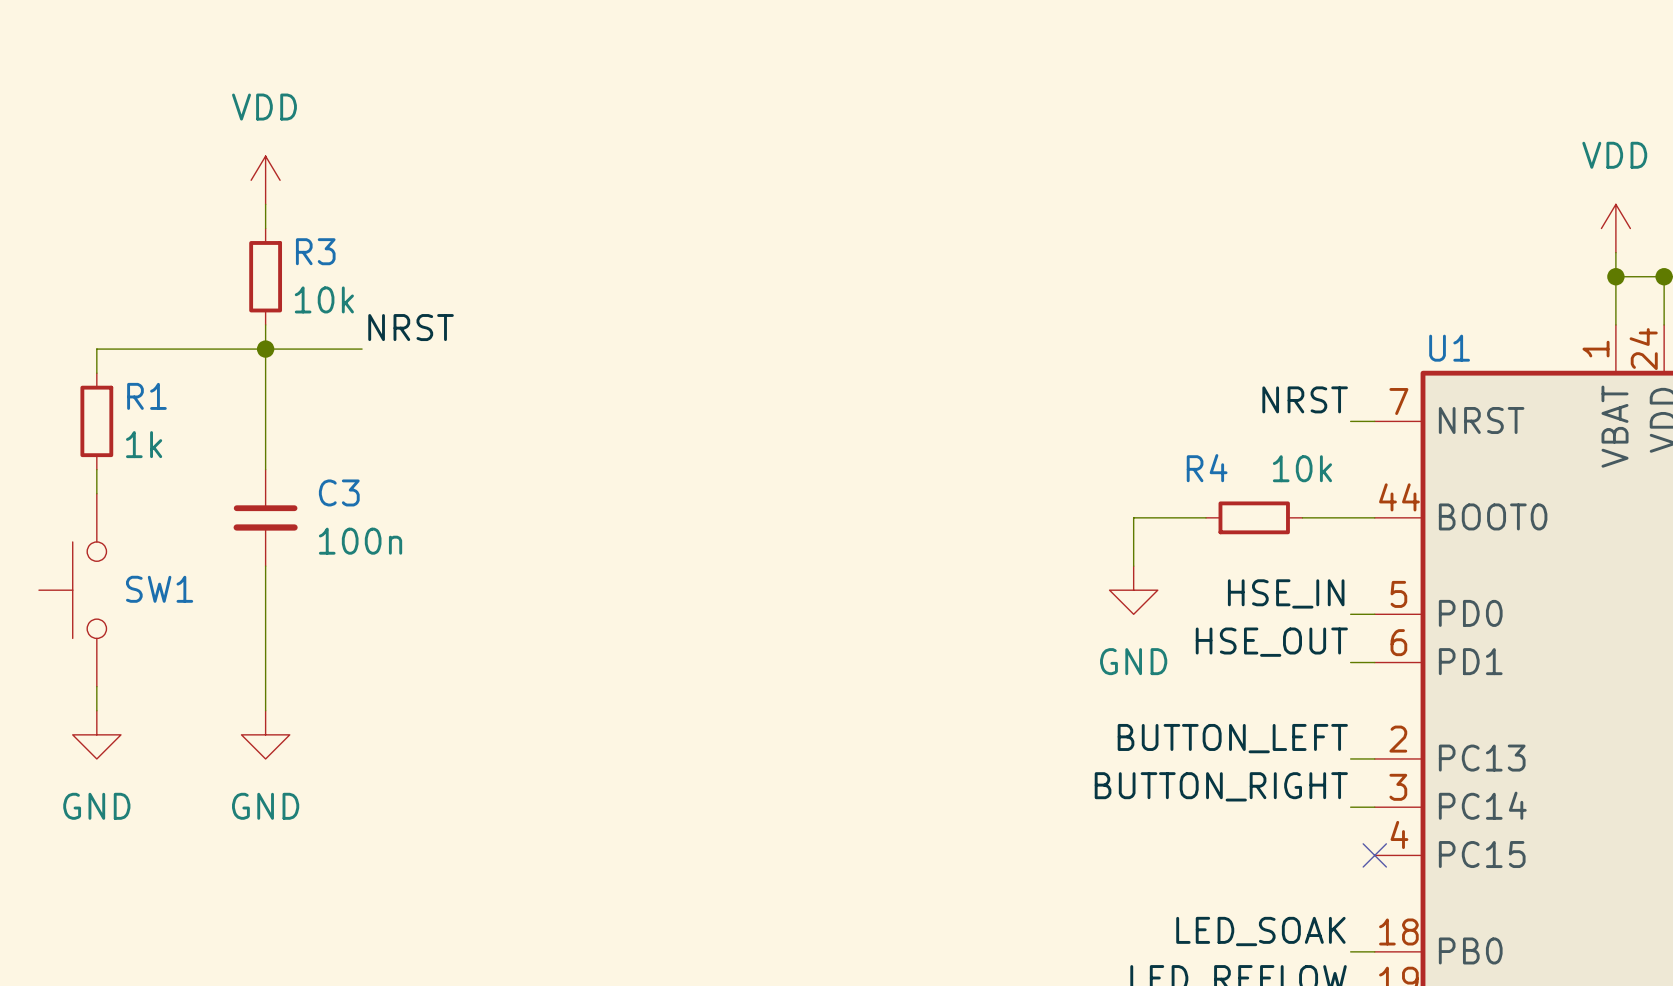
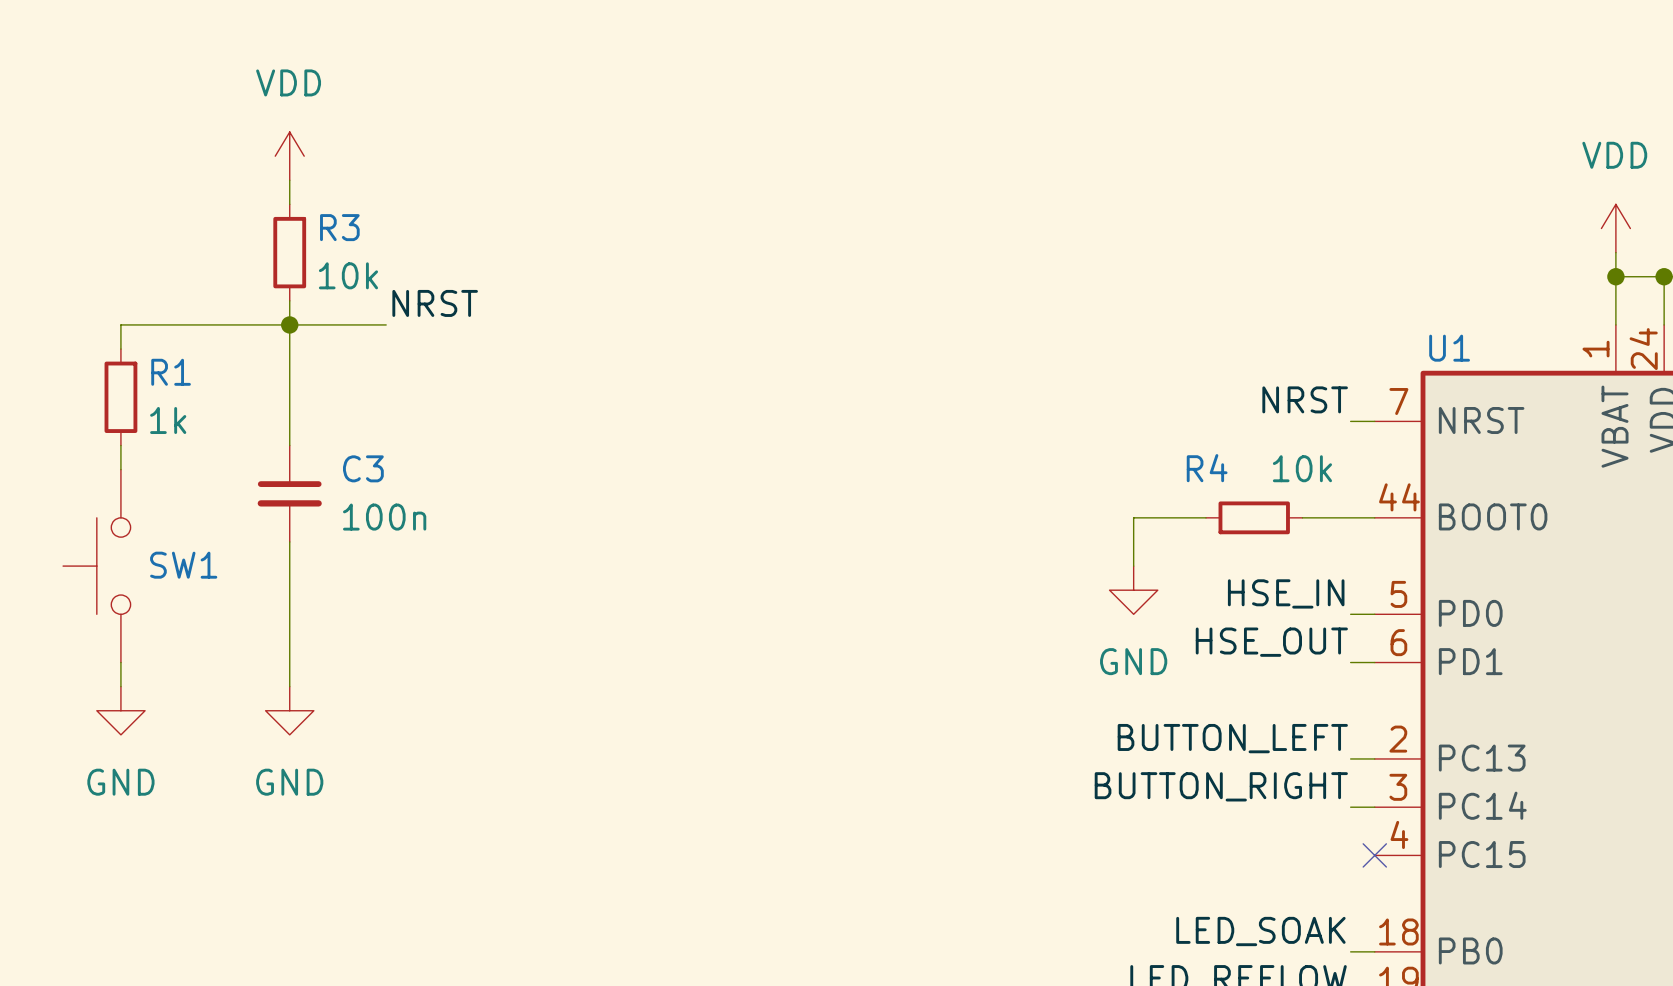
power symbol position: VDD (265, 180) -> VDD (289, 156)
wire: (265, 204) (265, 228) -> (289, 180) (289, 204)
R3 position: (265, 276) -> (289, 252)
wire: (265, 324) (265, 469) -> (289, 300) (289, 445)
label position: NRST (411, 327) -> NRST (435, 303)
junction position: (265, 349) -> (289, 324)
wire: (362, 349) (96, 349) (96, 373) -> (386, 324) (120, 324) (120, 349)
R1 position: (96, 421) -> (120, 397)
wire: (96, 469) (96, 493) -> (120, 445) (120, 469)
C3 position: (265, 517) -> (289, 493)
wire: (265, 566) (265, 710) -> (289, 541) (289, 686)
SW1 position: (72, 590) -> (96, 566)
wire: (96, 686) (96, 710) -> (120, 662) (120, 686)
power symbol position: GND (96, 734) -> GND (120, 710)
power symbol position: GND (265, 734) -> GND (289, 710)

